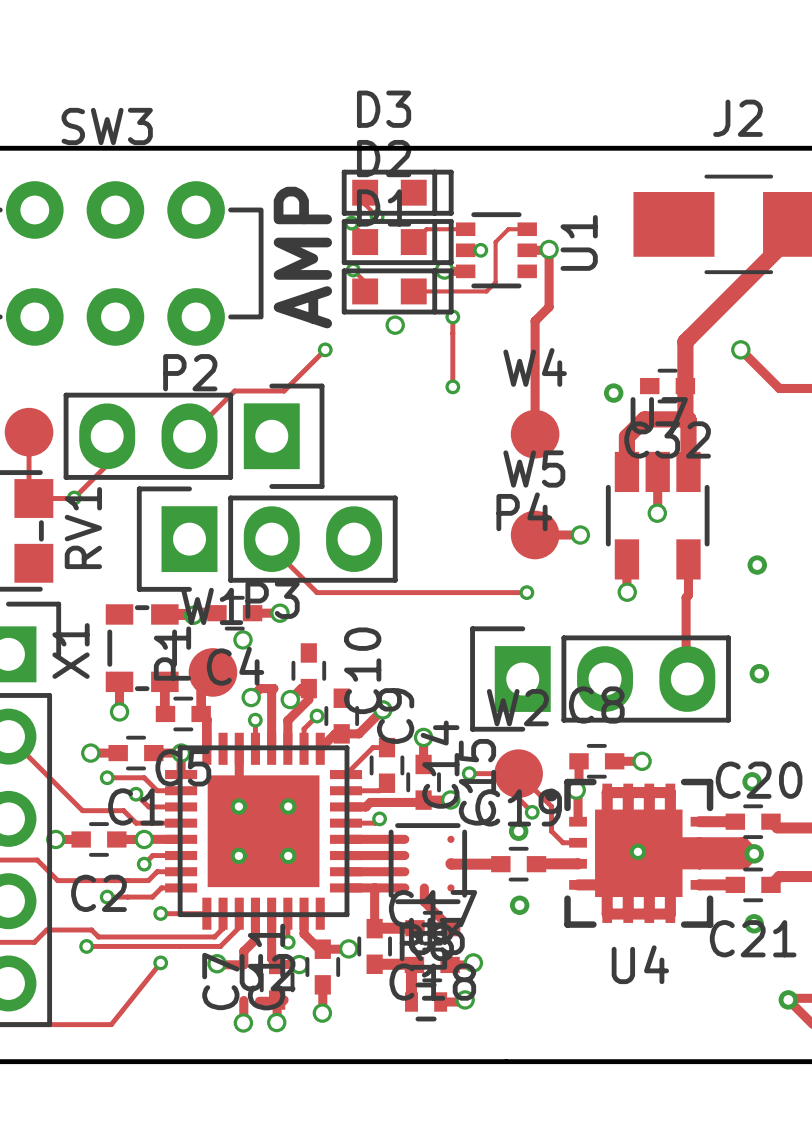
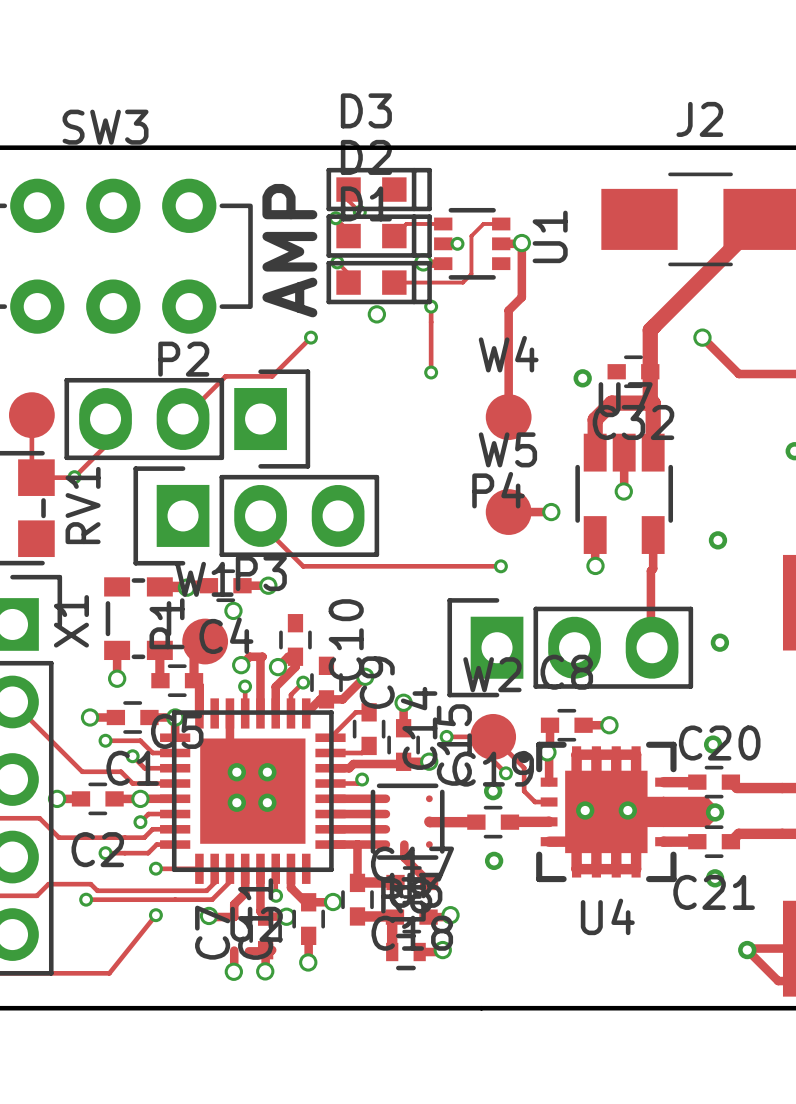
part footprint: [230, 798, 248, 815] -> [227, 763, 246, 782]
part footprint: [280, 798, 297, 815] -> [258, 763, 277, 782]
part footprint: [230, 847, 248, 865] -> [227, 793, 246, 812]
part footprint: [280, 847, 297, 865] -> [258, 793, 277, 812]
part: none -> (585, 810)
part: (637, 851) -> none
part: none -> (627, 810)

